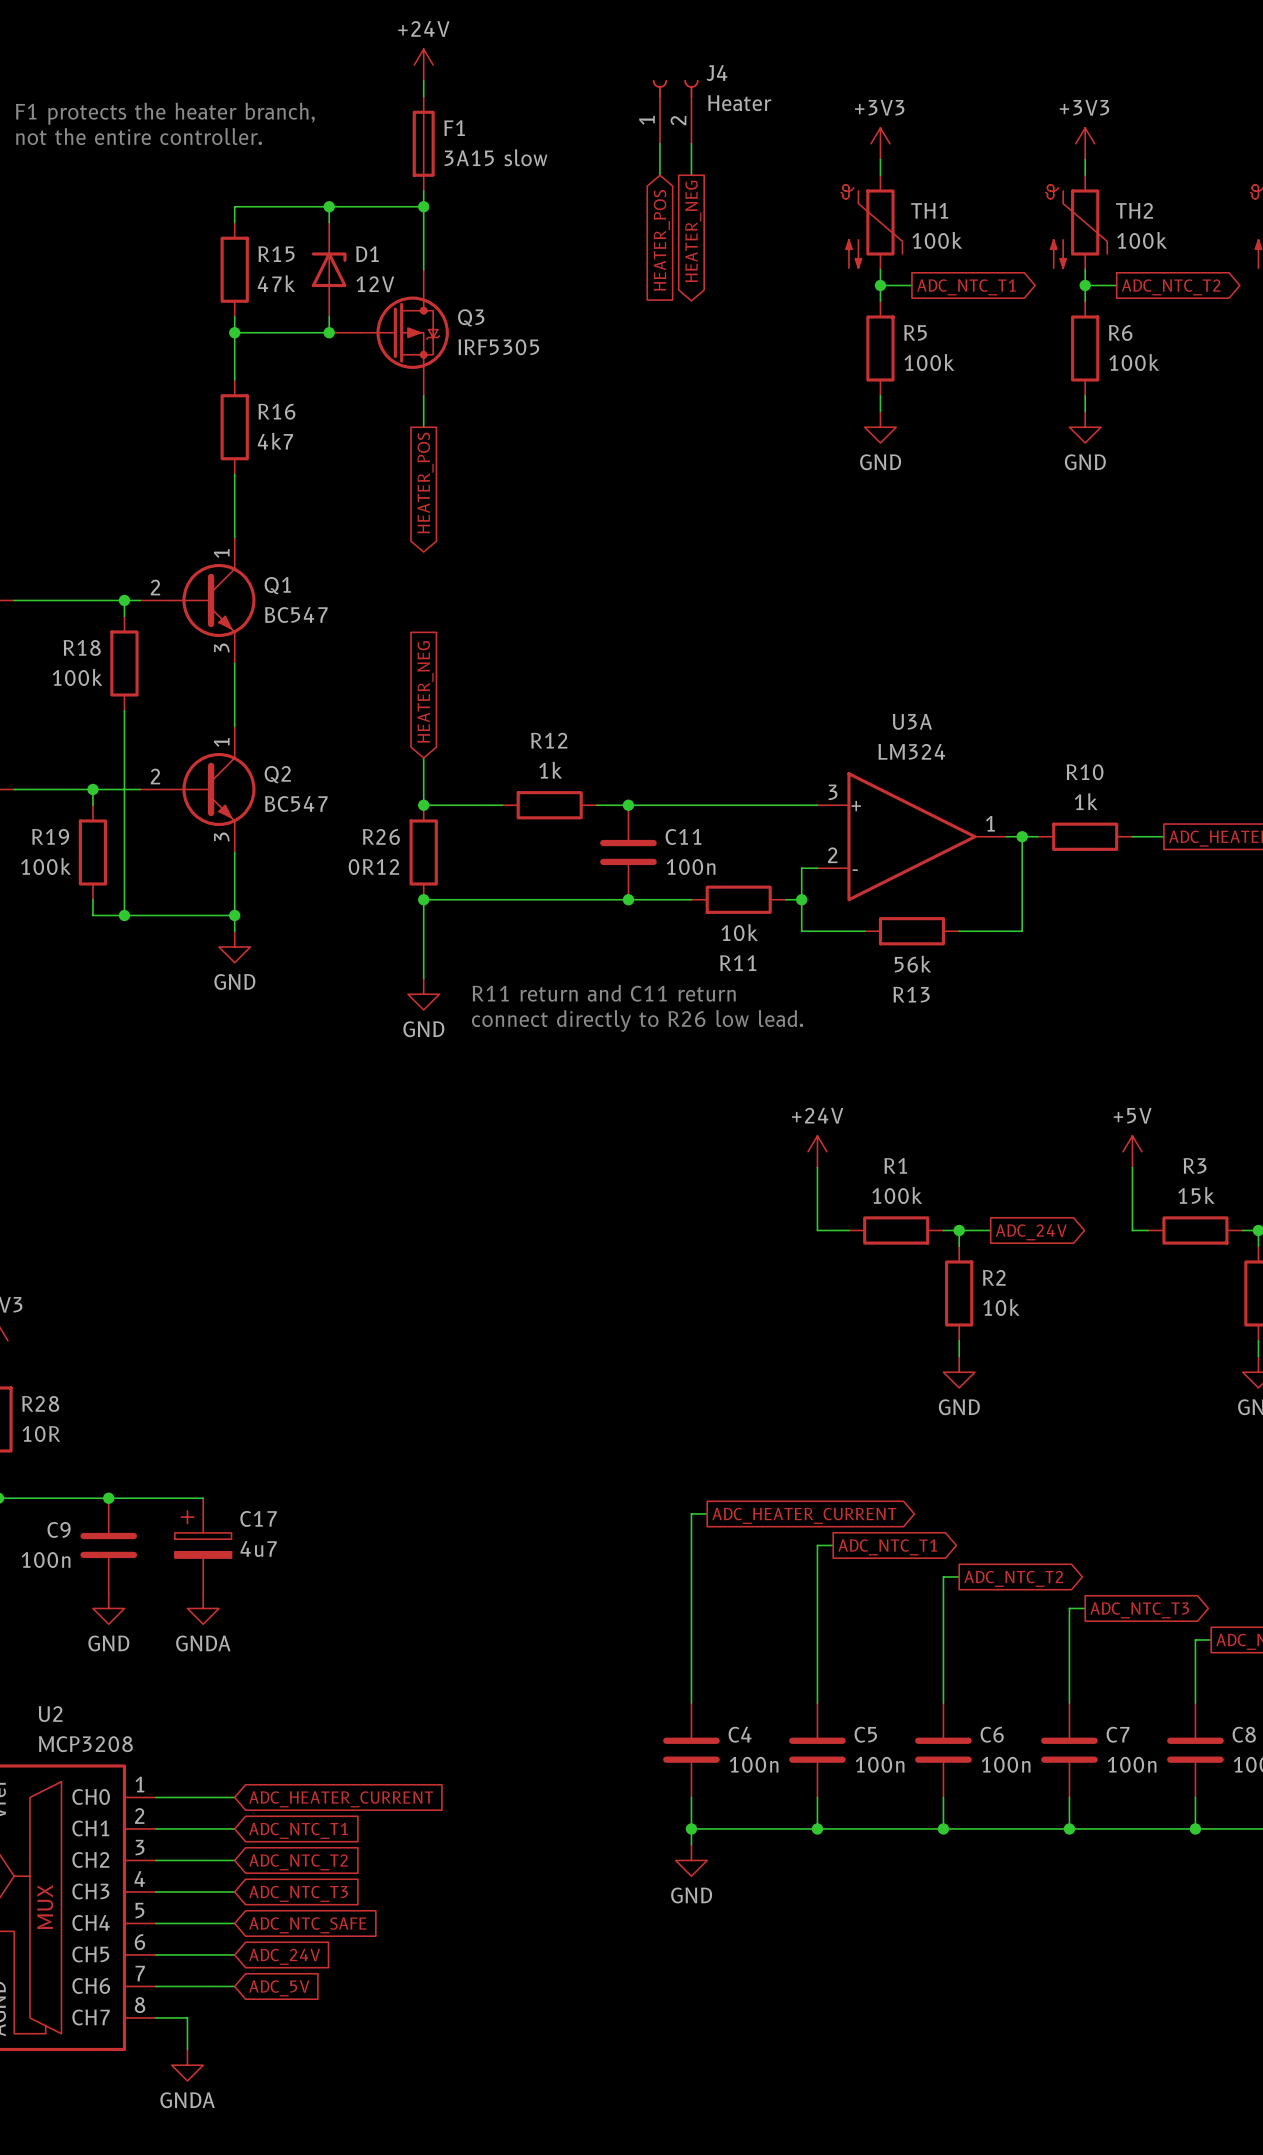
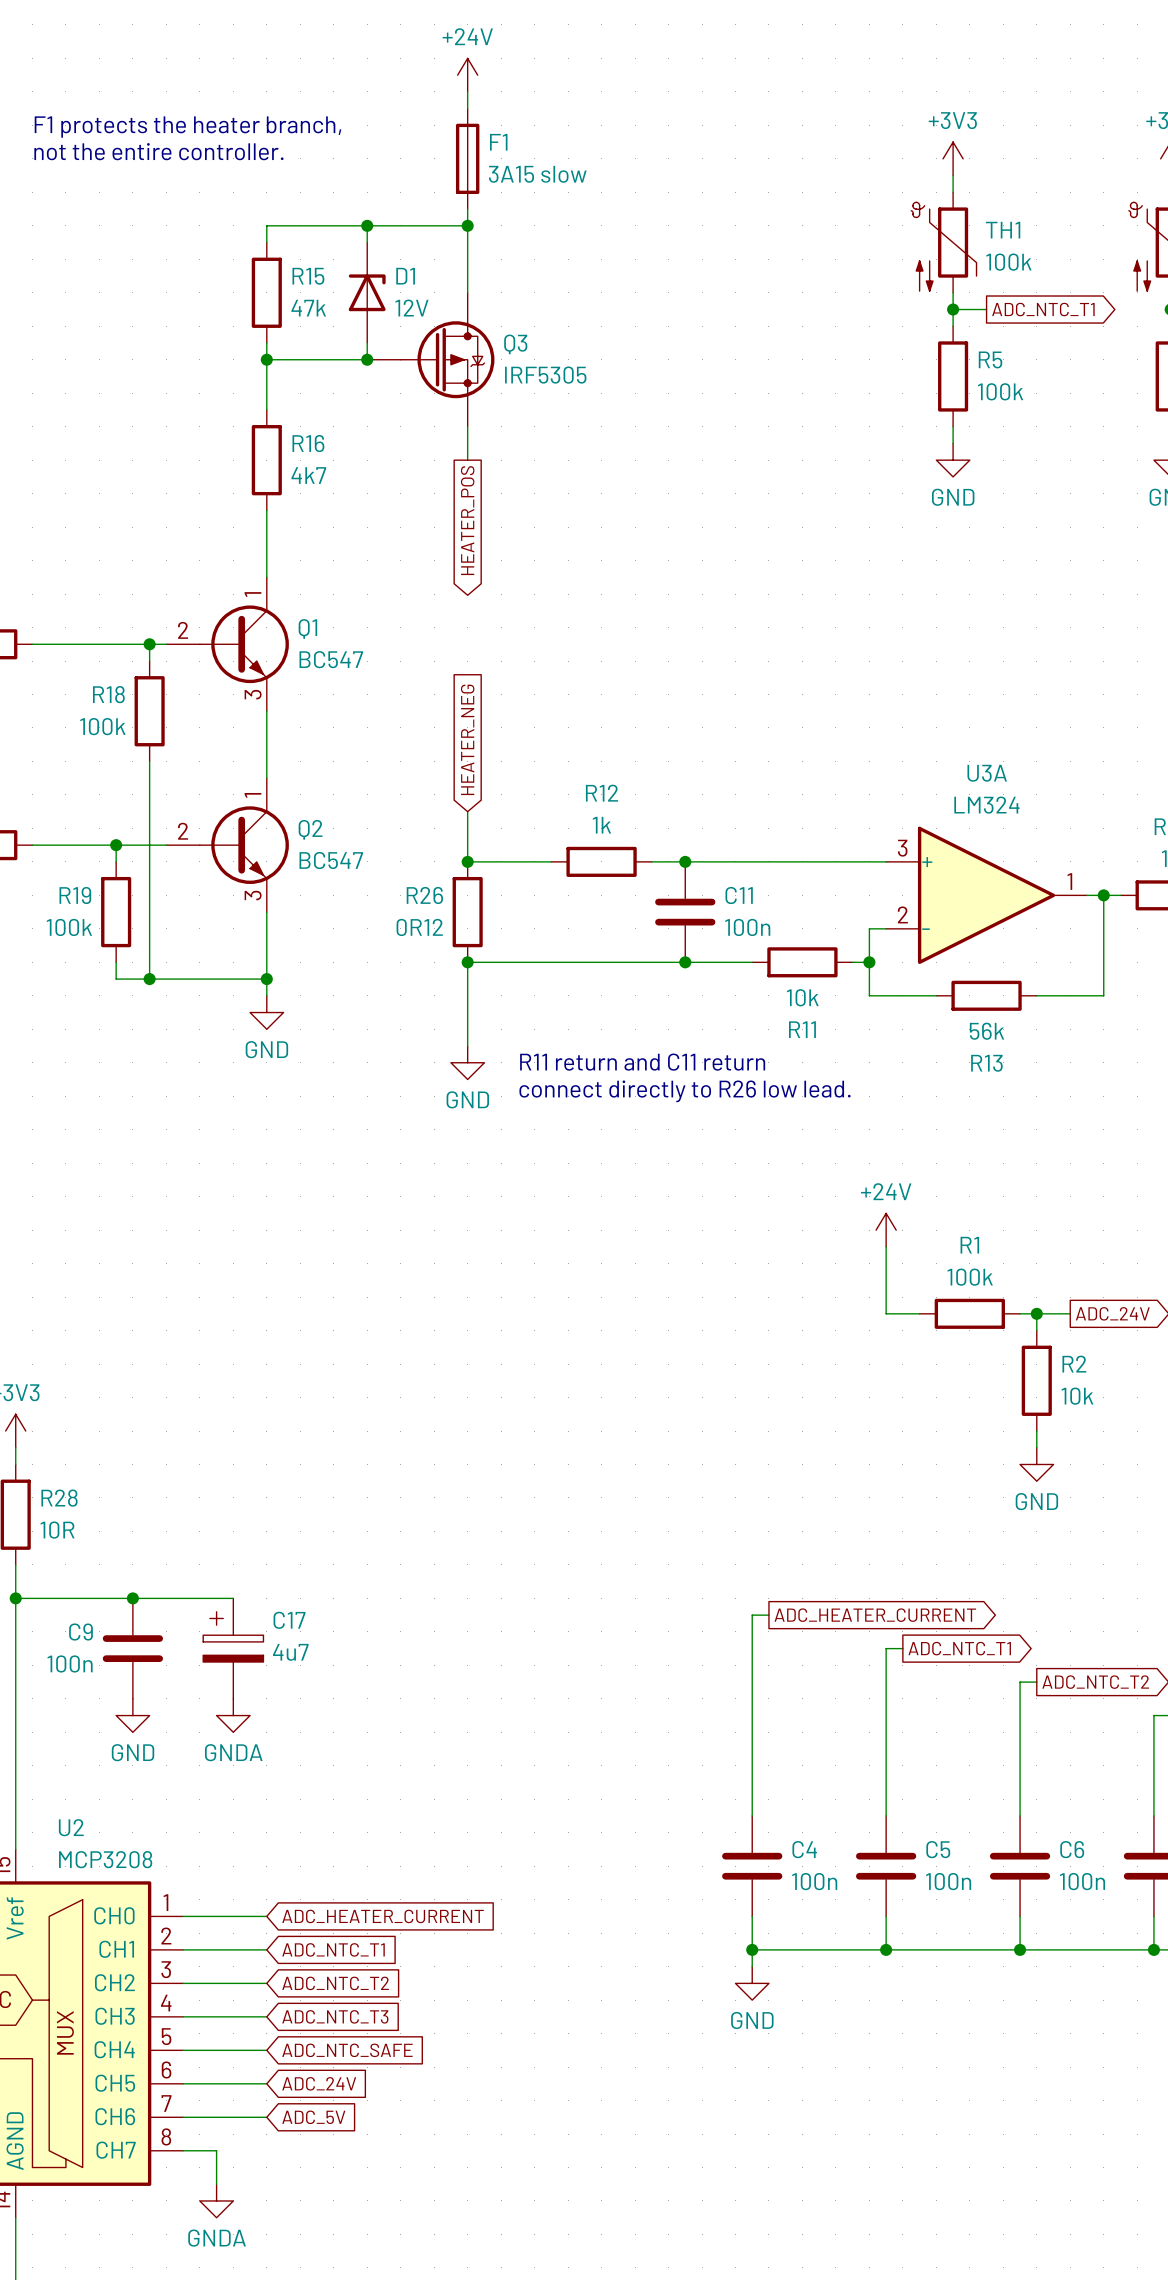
J4: Heater (675, 111) -> none
wire: (659, 143) (659, 175) -> none
wire: (691, 143) (691, 175) -> none
global label: HEATER_NEG (693, 231) -> none
global label: HEATER_POS (661, 240) -> none

